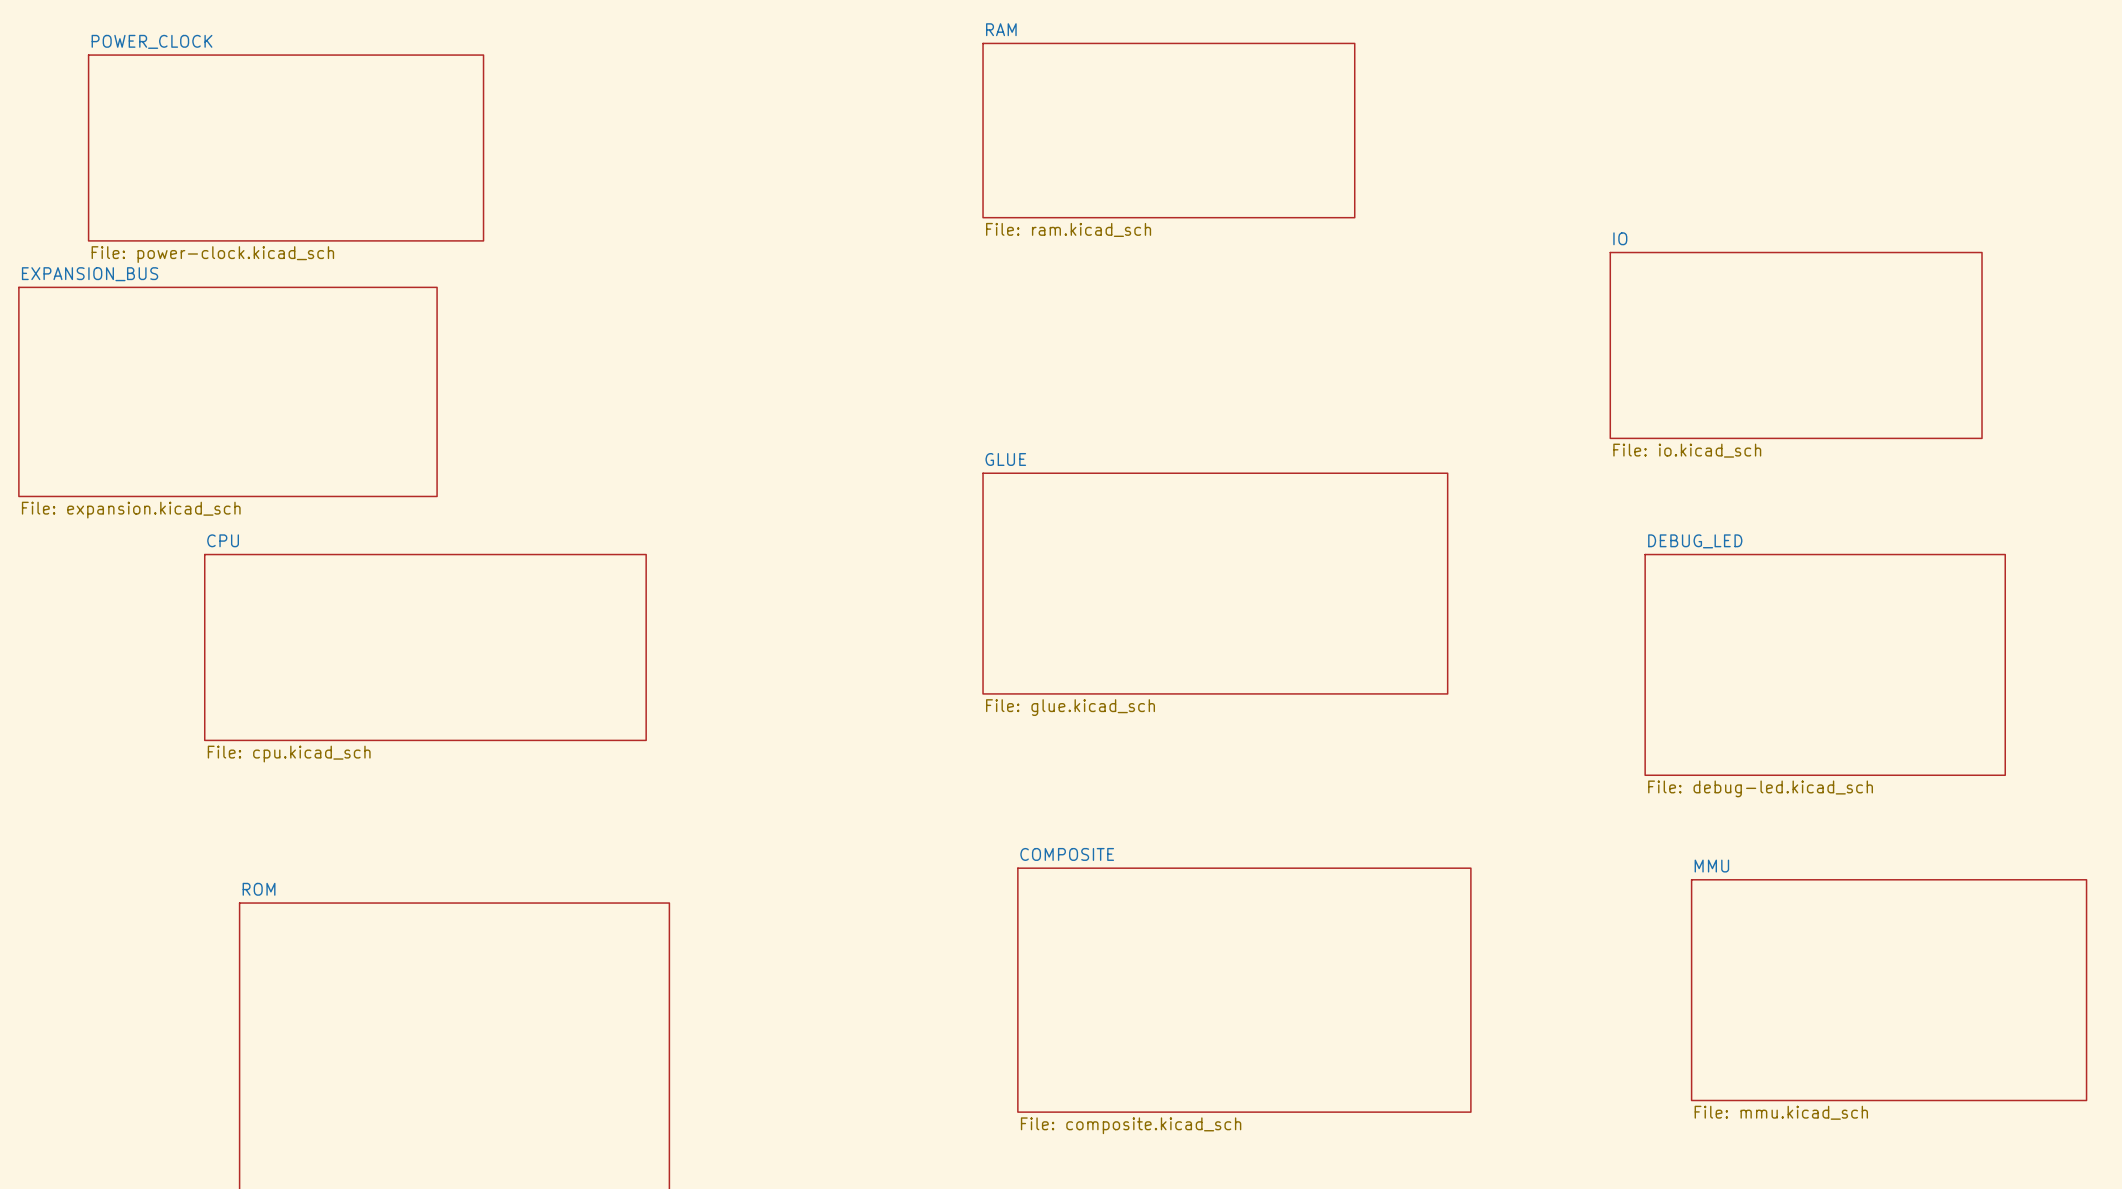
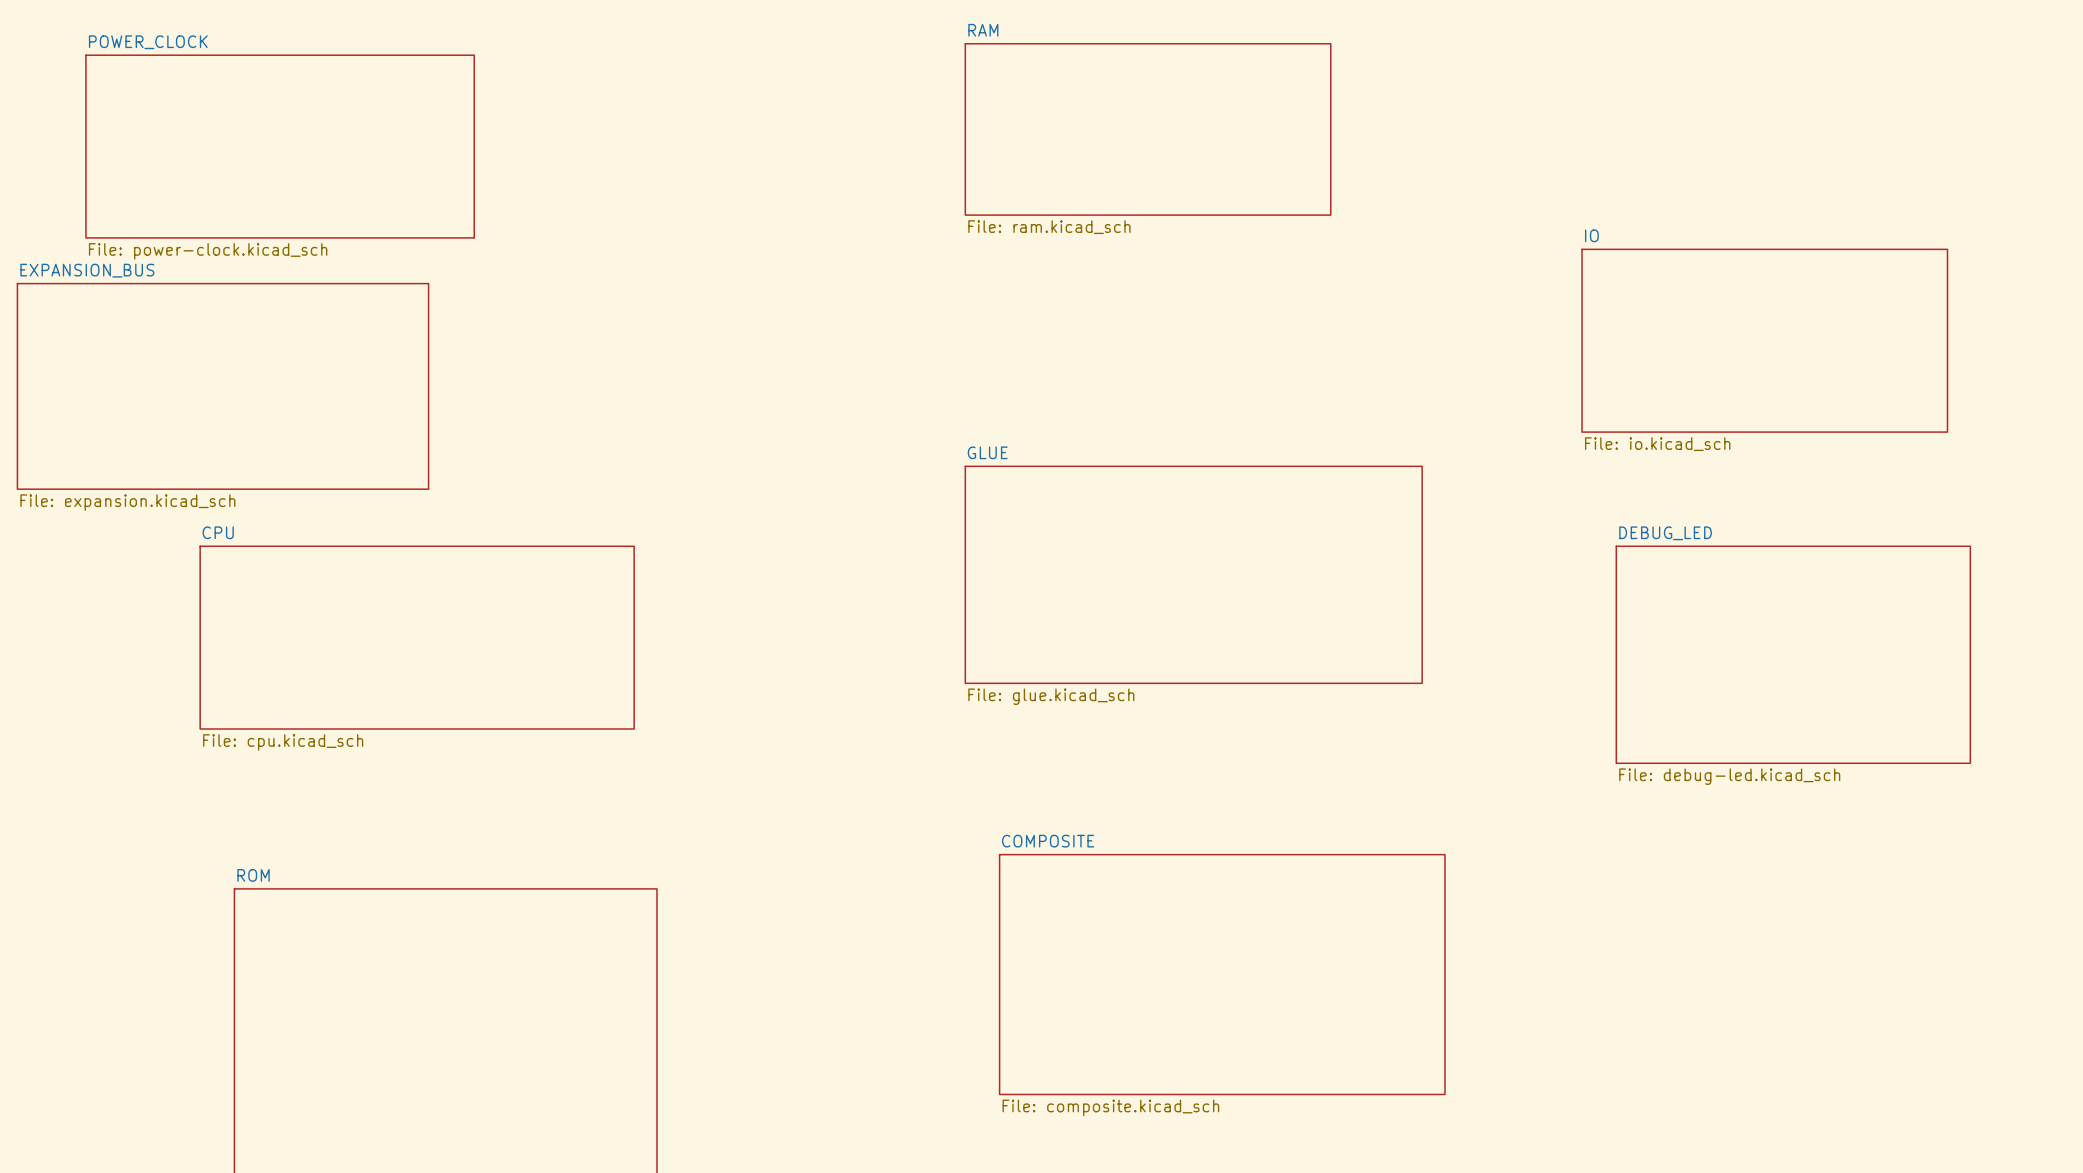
sheet MMU: File: mmu.kicad_sch (1889, 990) -> none

